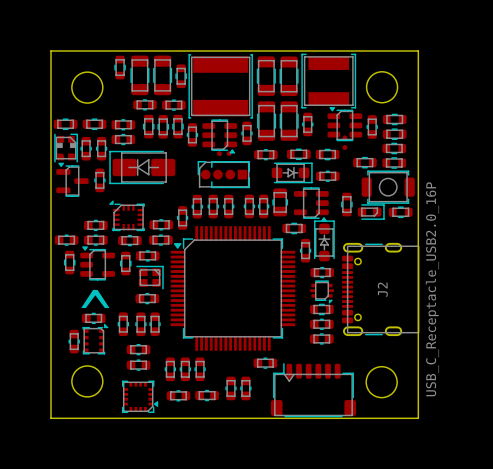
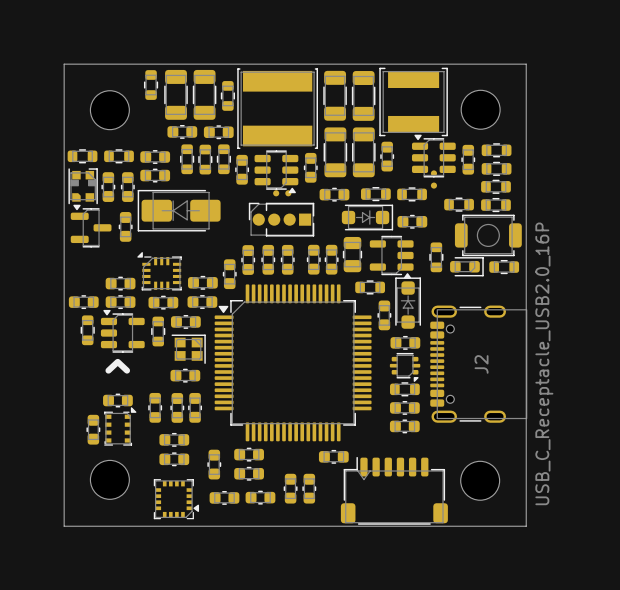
part: none -> (249, 454)
part: (185, 369) -> none
part: (200, 369) -> none
part: none -> (249, 473)

